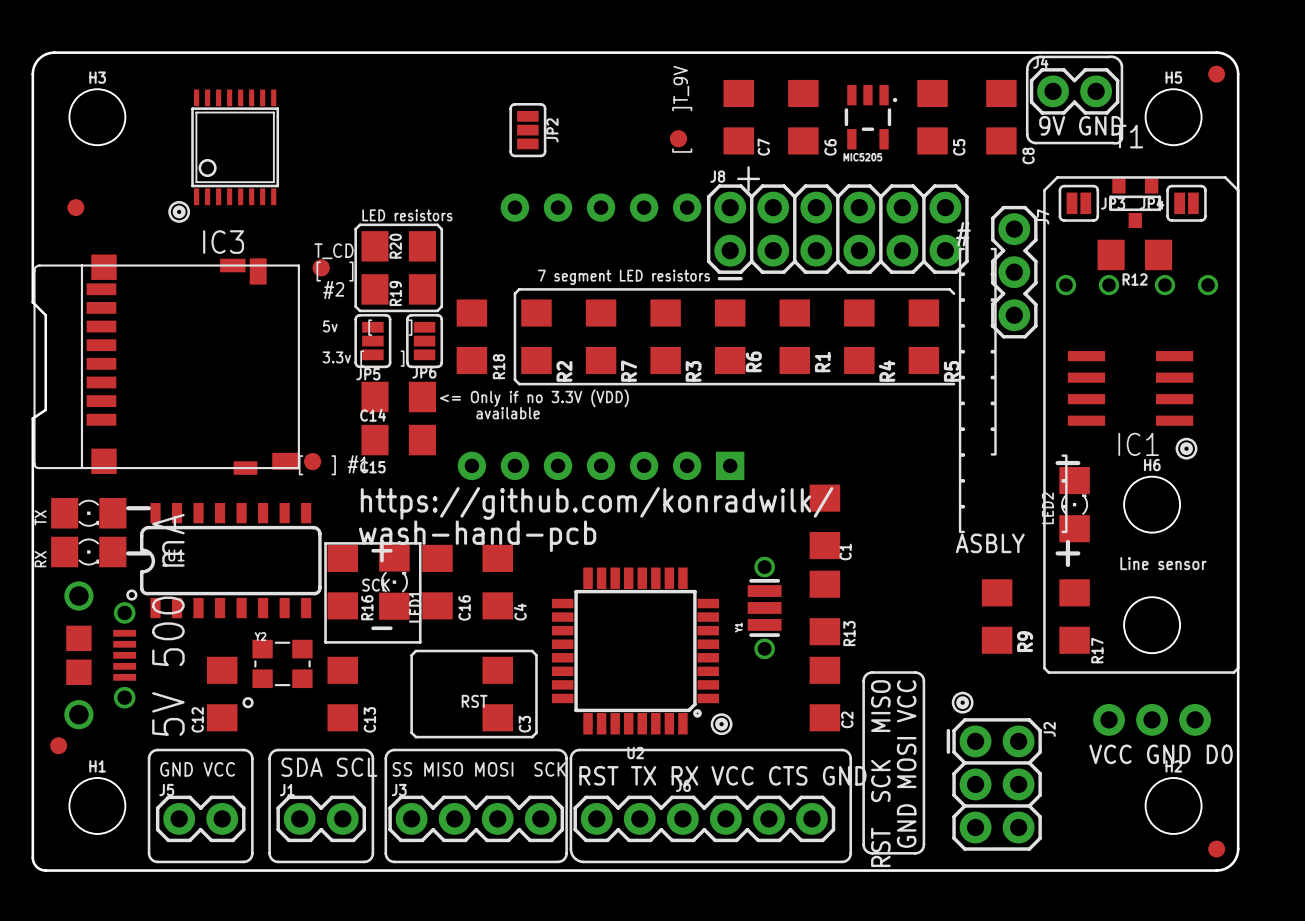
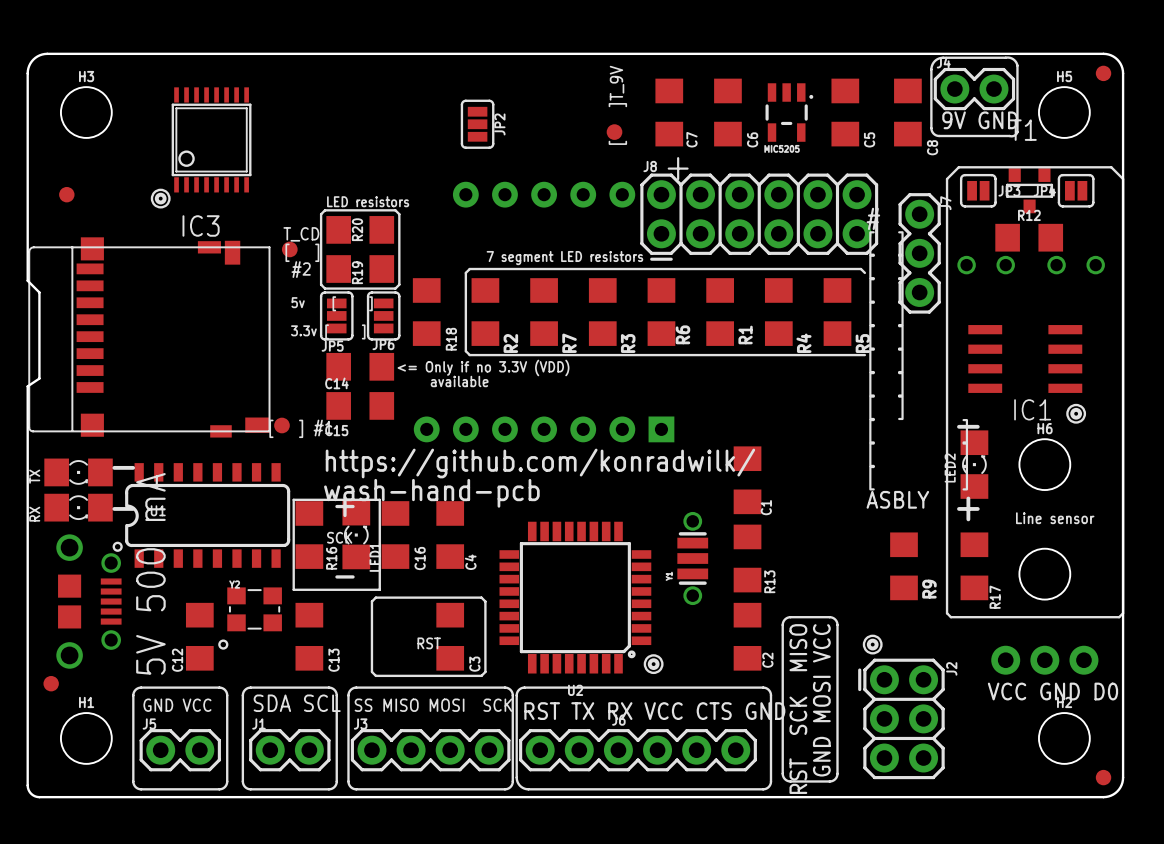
R12 name position: R12 (1135, 279) -> R12 (1029, 215)

